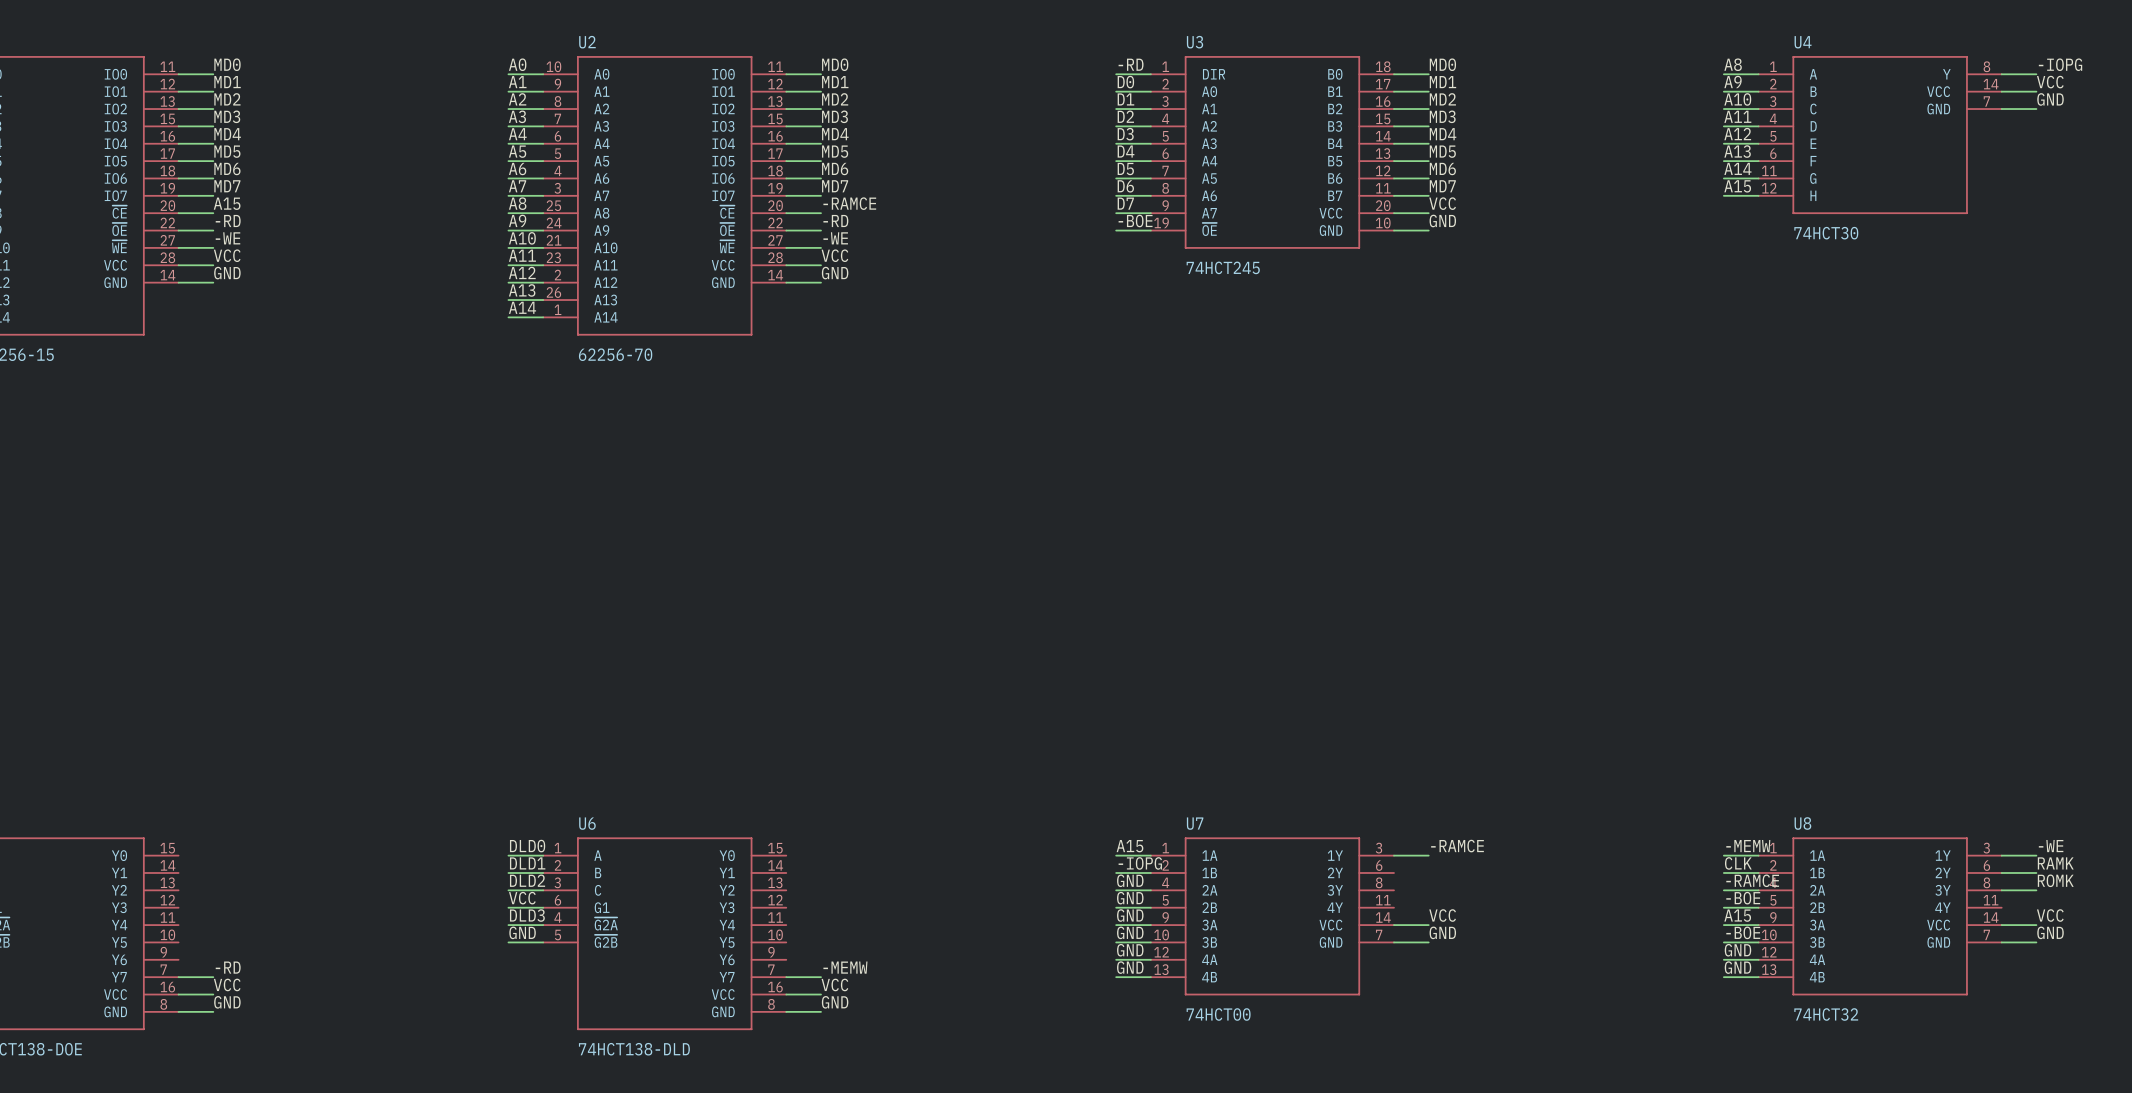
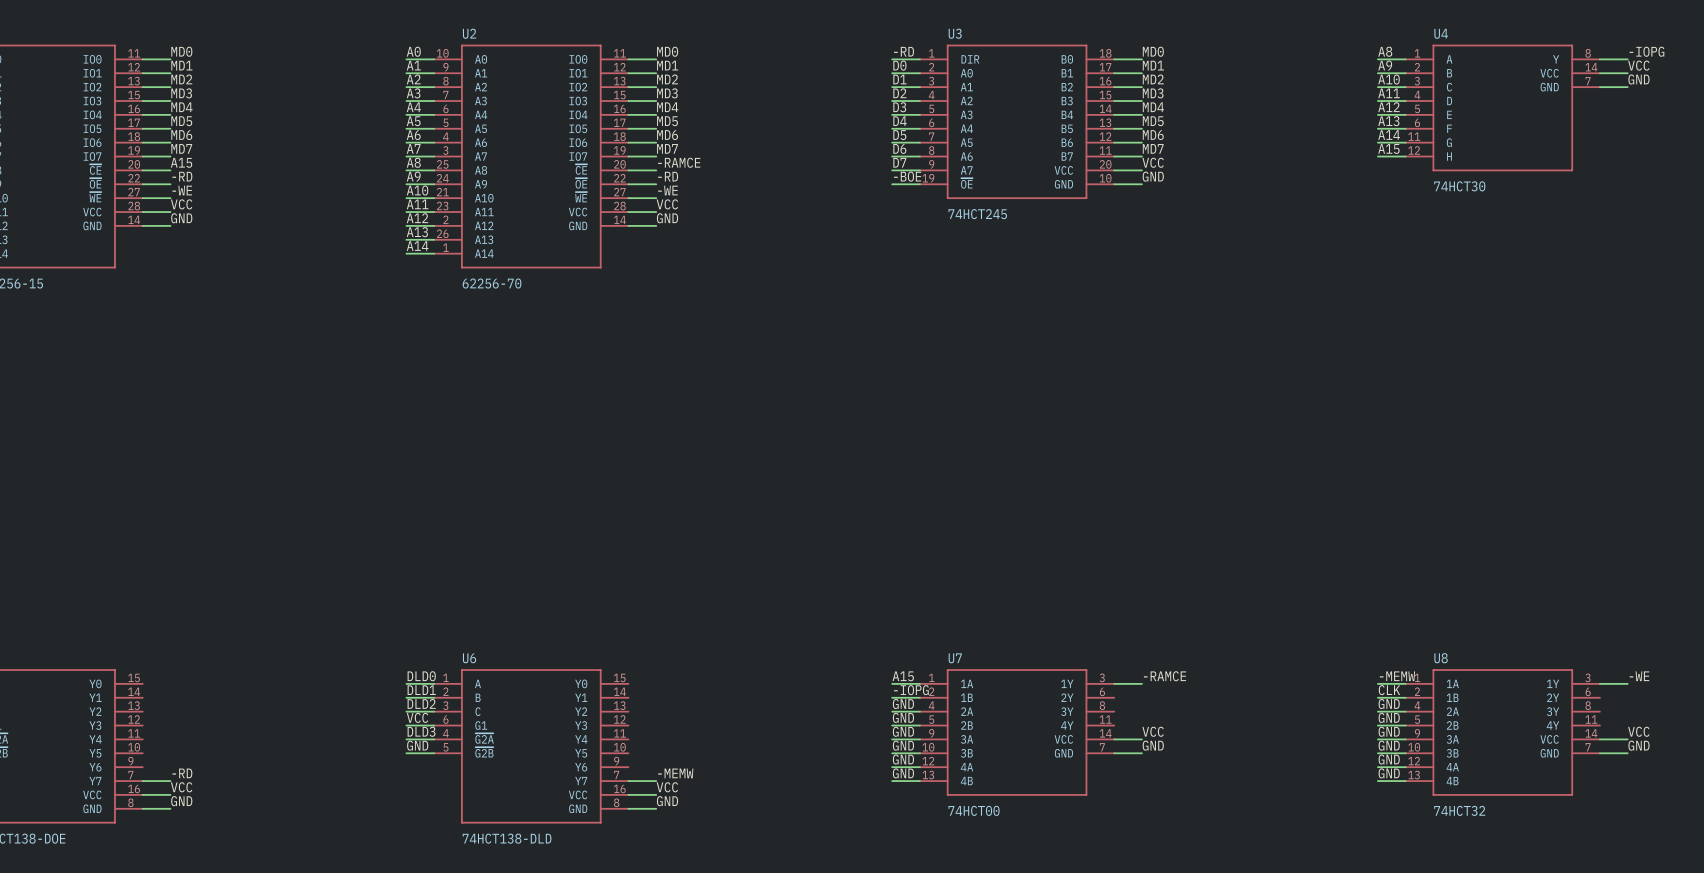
label: RAMK (2055, 863) -> none
wire: (2001, 872) (2036, 872) -> none
label: -RAMCE (1752, 880) -> GND (1389, 704)
label: ROMK (2055, 880) -> none
wire: (2001, 890) (2036, 890) -> none
label: -BOE (1743, 898) -> GND (1389, 717)
label: A15 (1737, 915) -> GND (1389, 731)
label: -BOE (1743, 932) -> GND (1389, 745)

